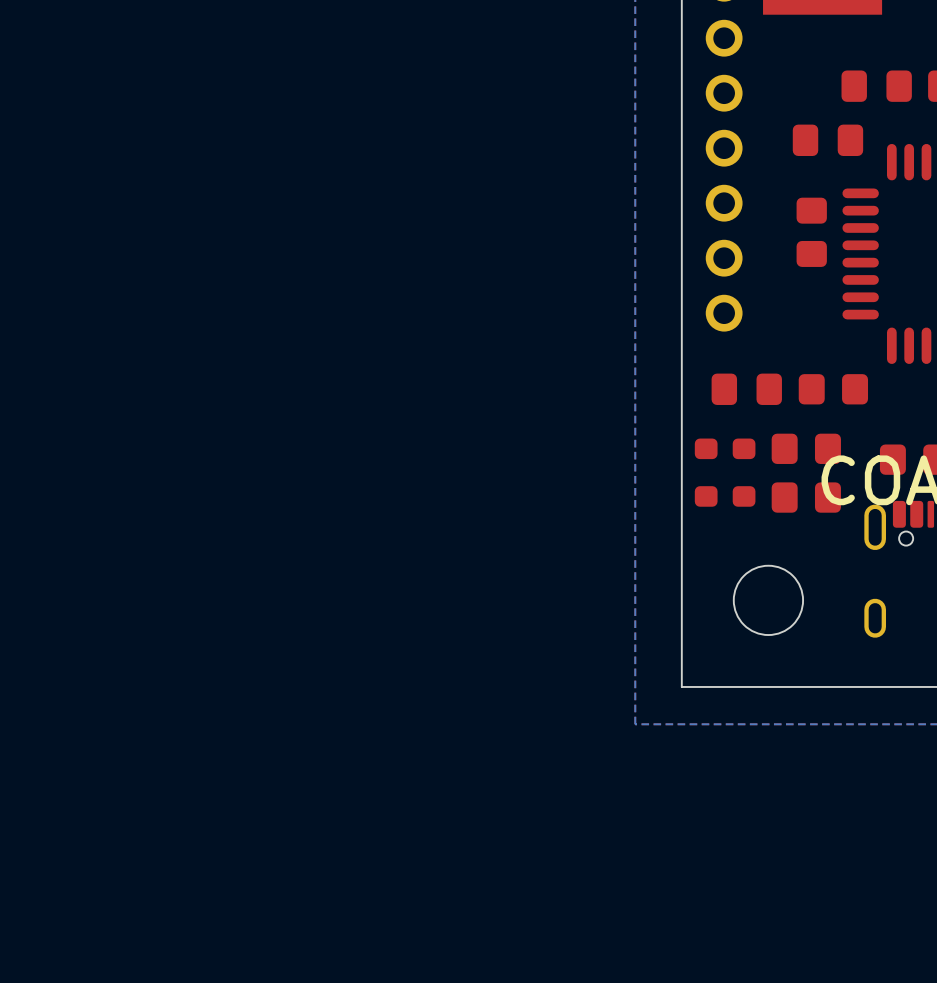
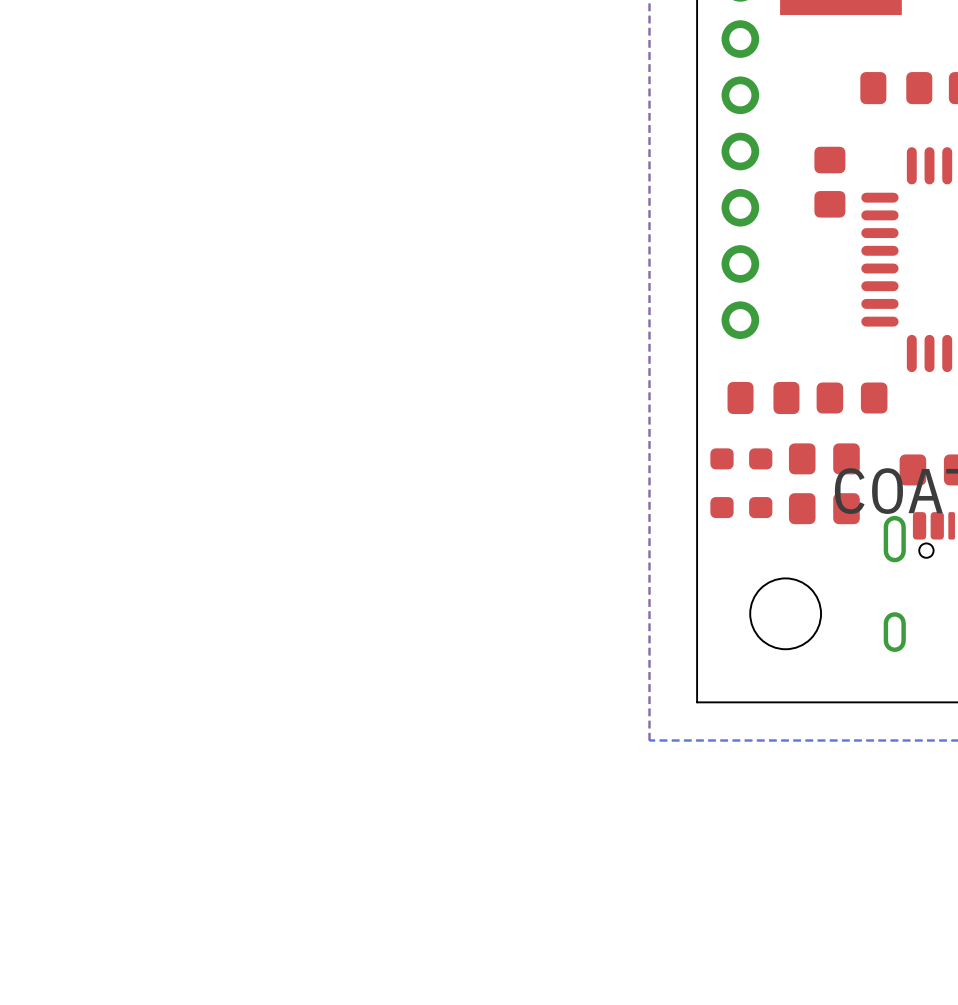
part: (827, 140) -> none
part position: (811, 232) -> (829, 182)

